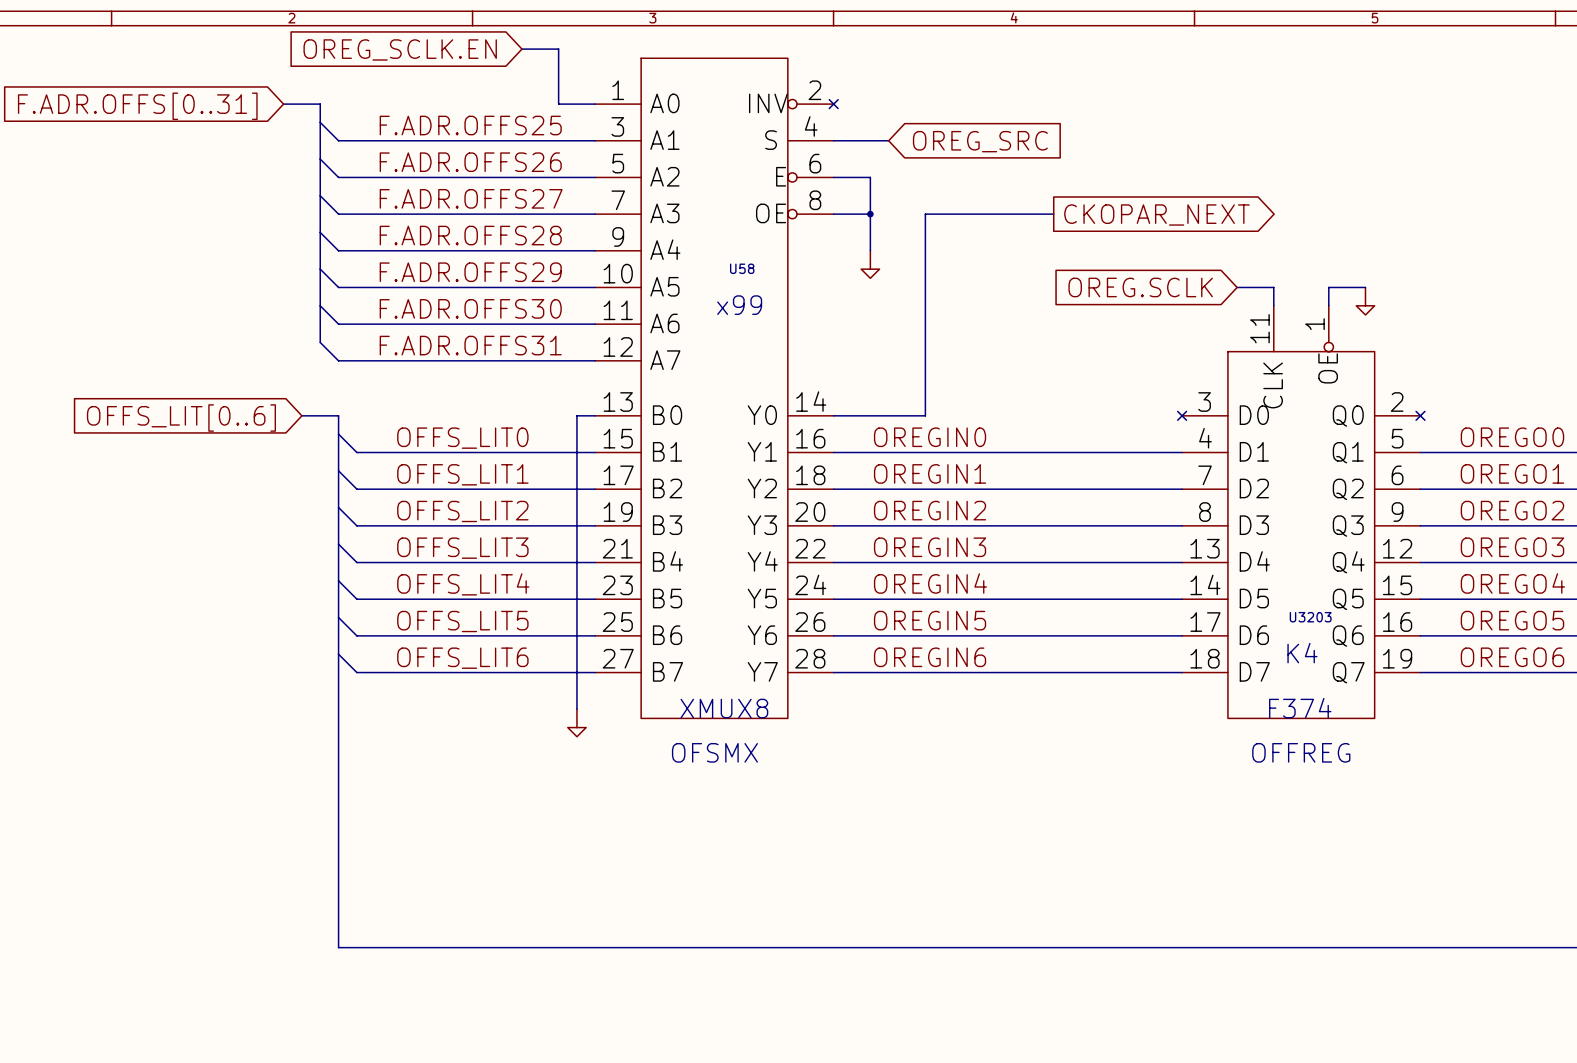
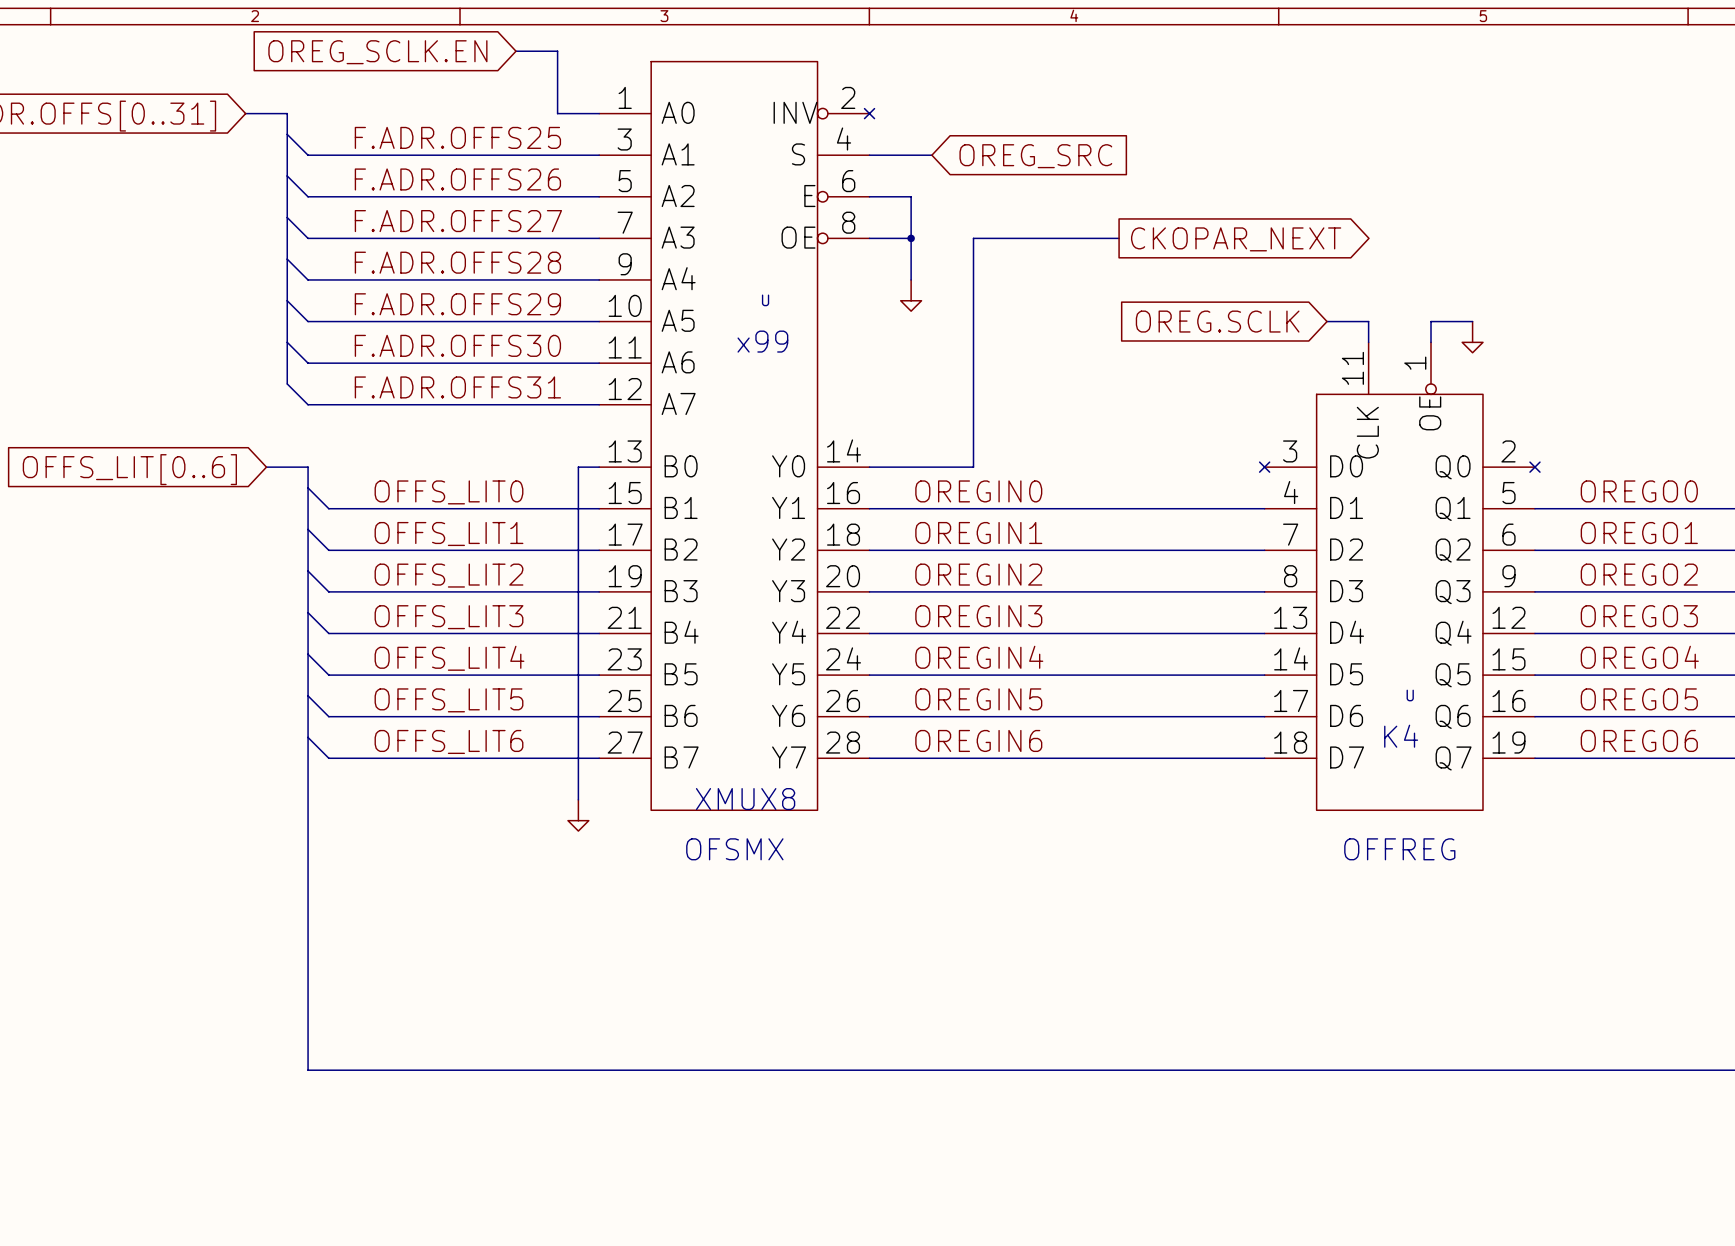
U58 name: U58 (742, 268) -> U (765, 300)
U3203 name: U3203 (1310, 617) -> U (1410, 695)
U3203 value: F374 (1300, 708) -> none

